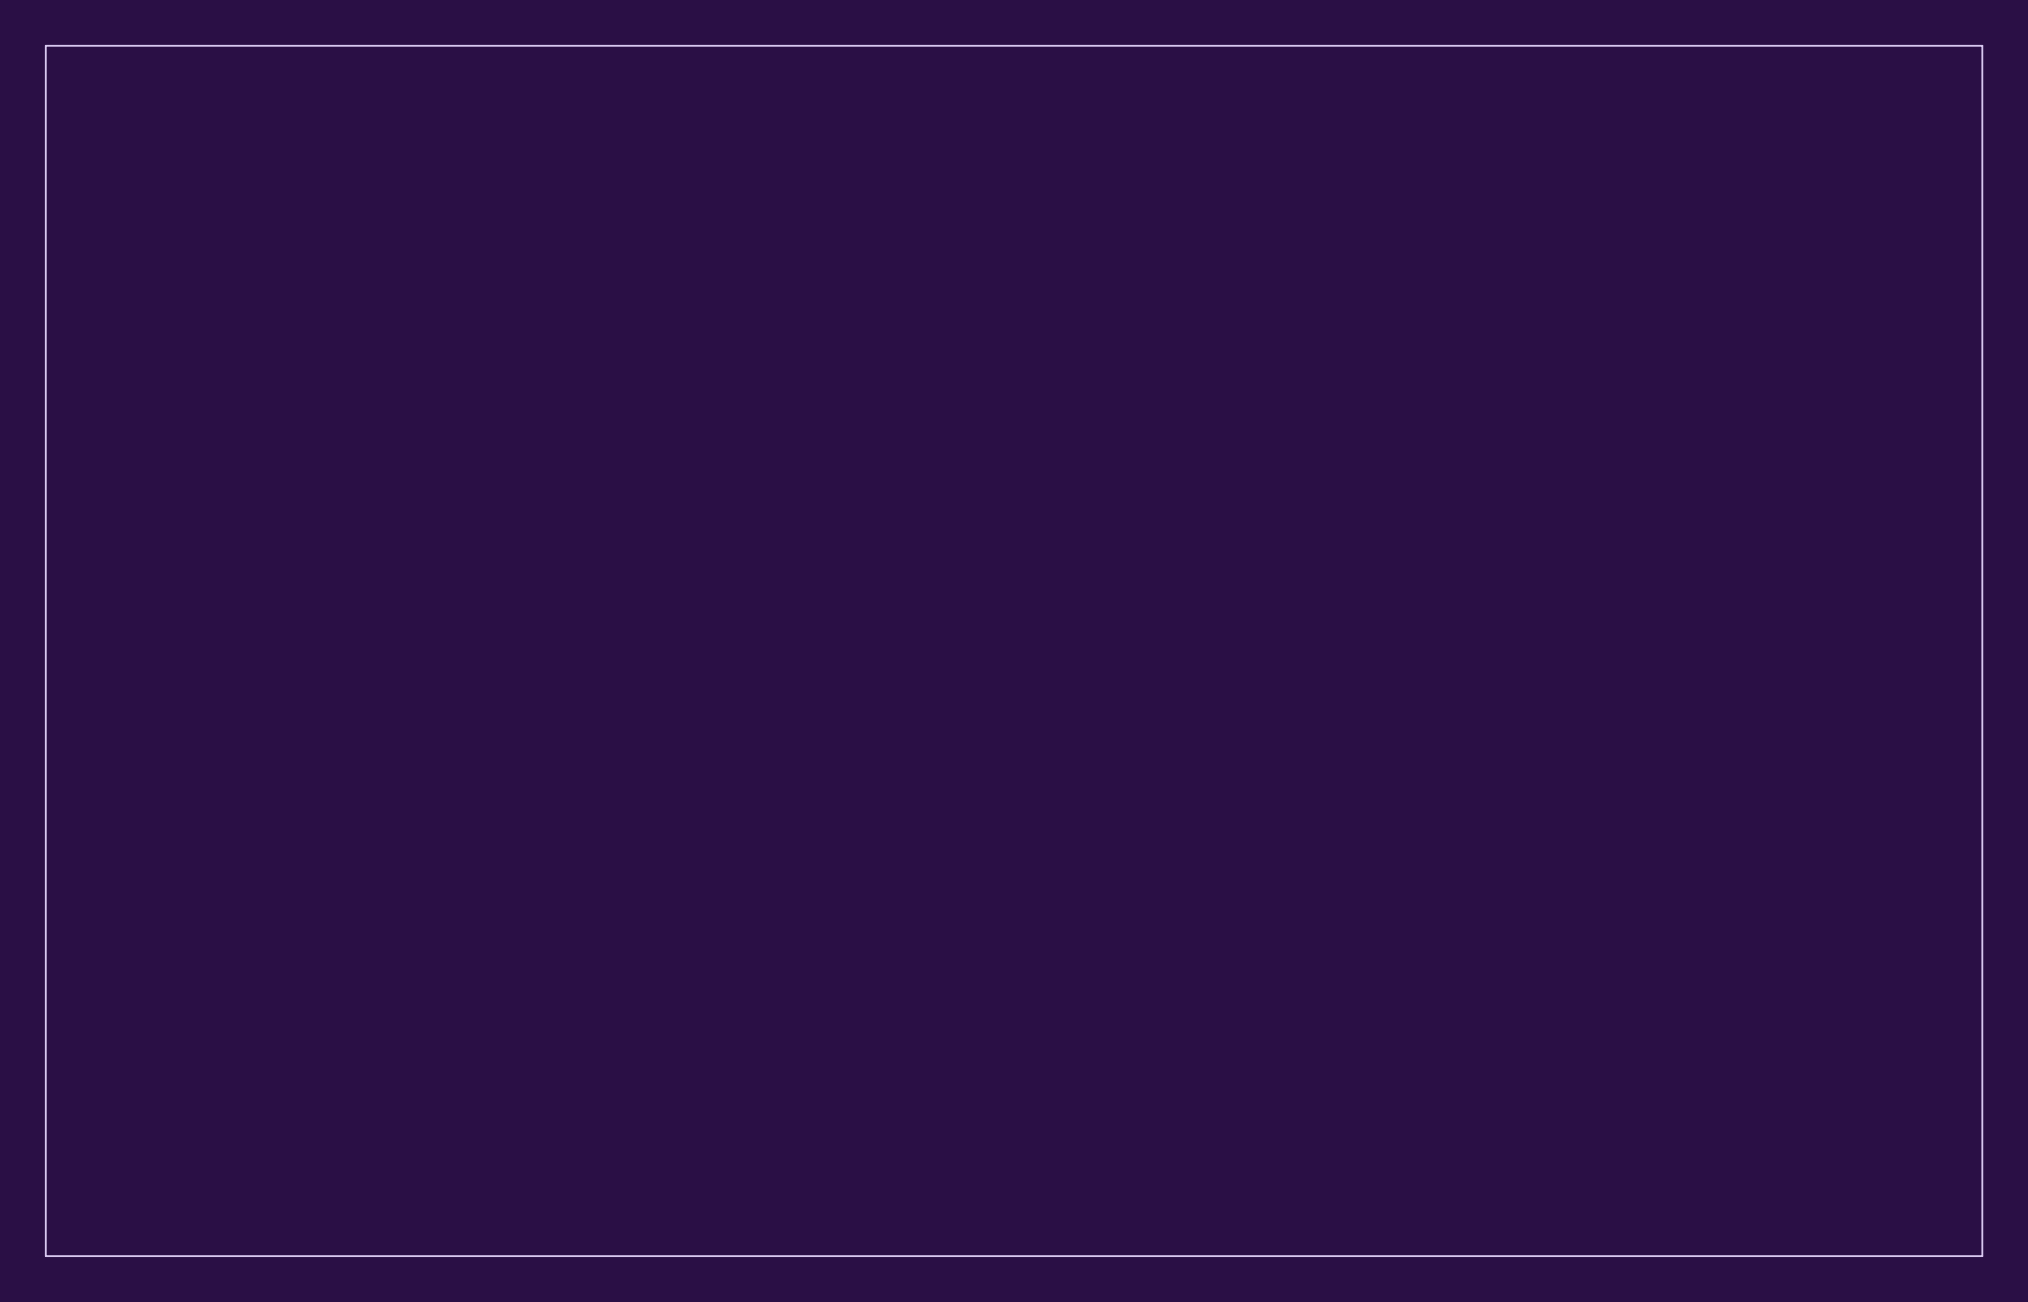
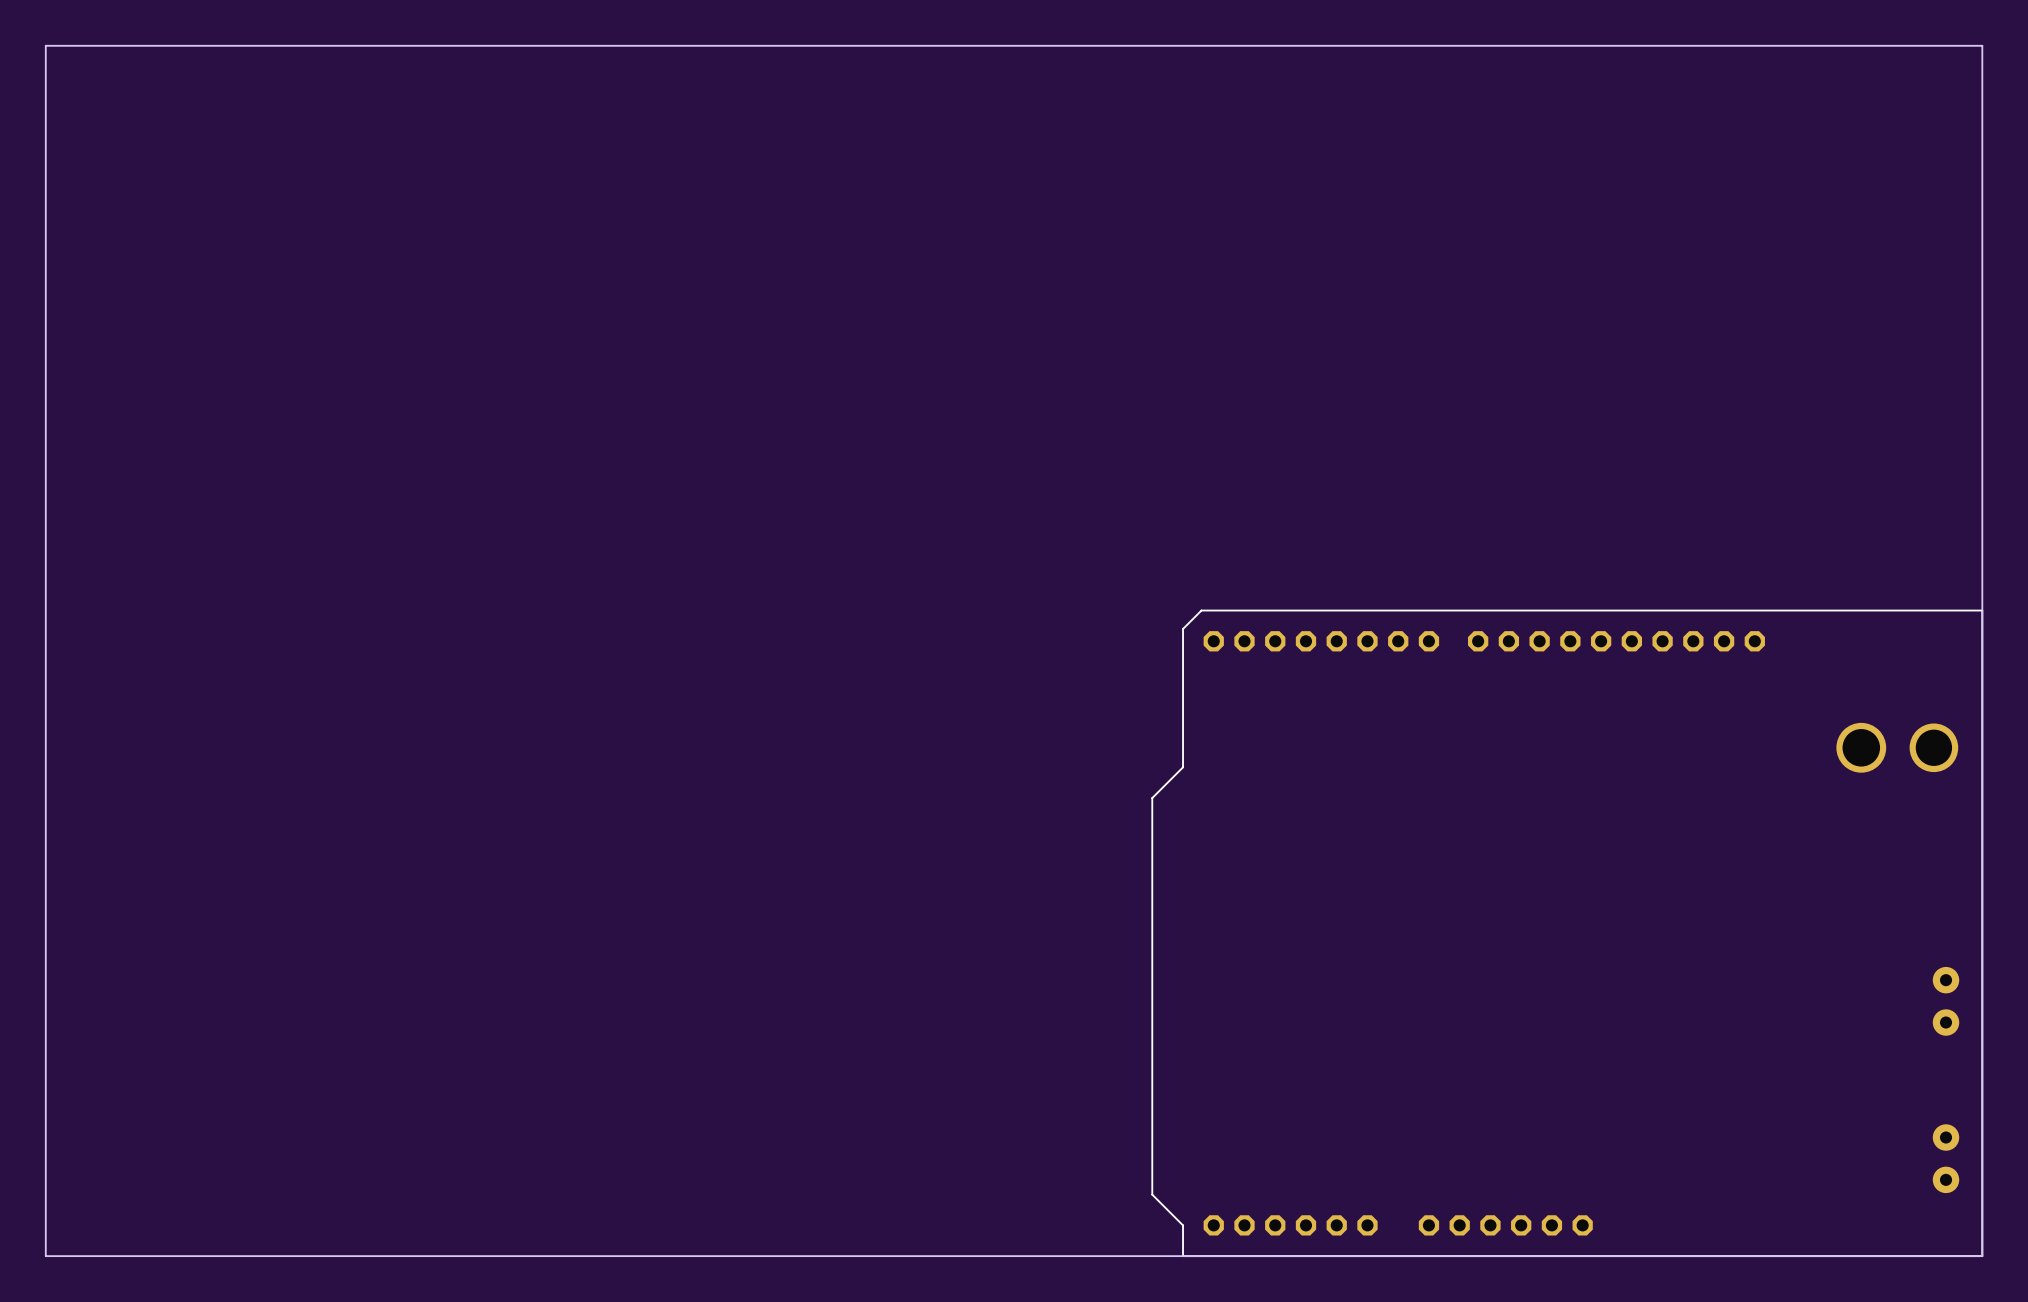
part: none -> (1897, 747)
part: none -> (1567, 933)
part: none -> (1946, 1001)
part: none -> (1946, 1158)

